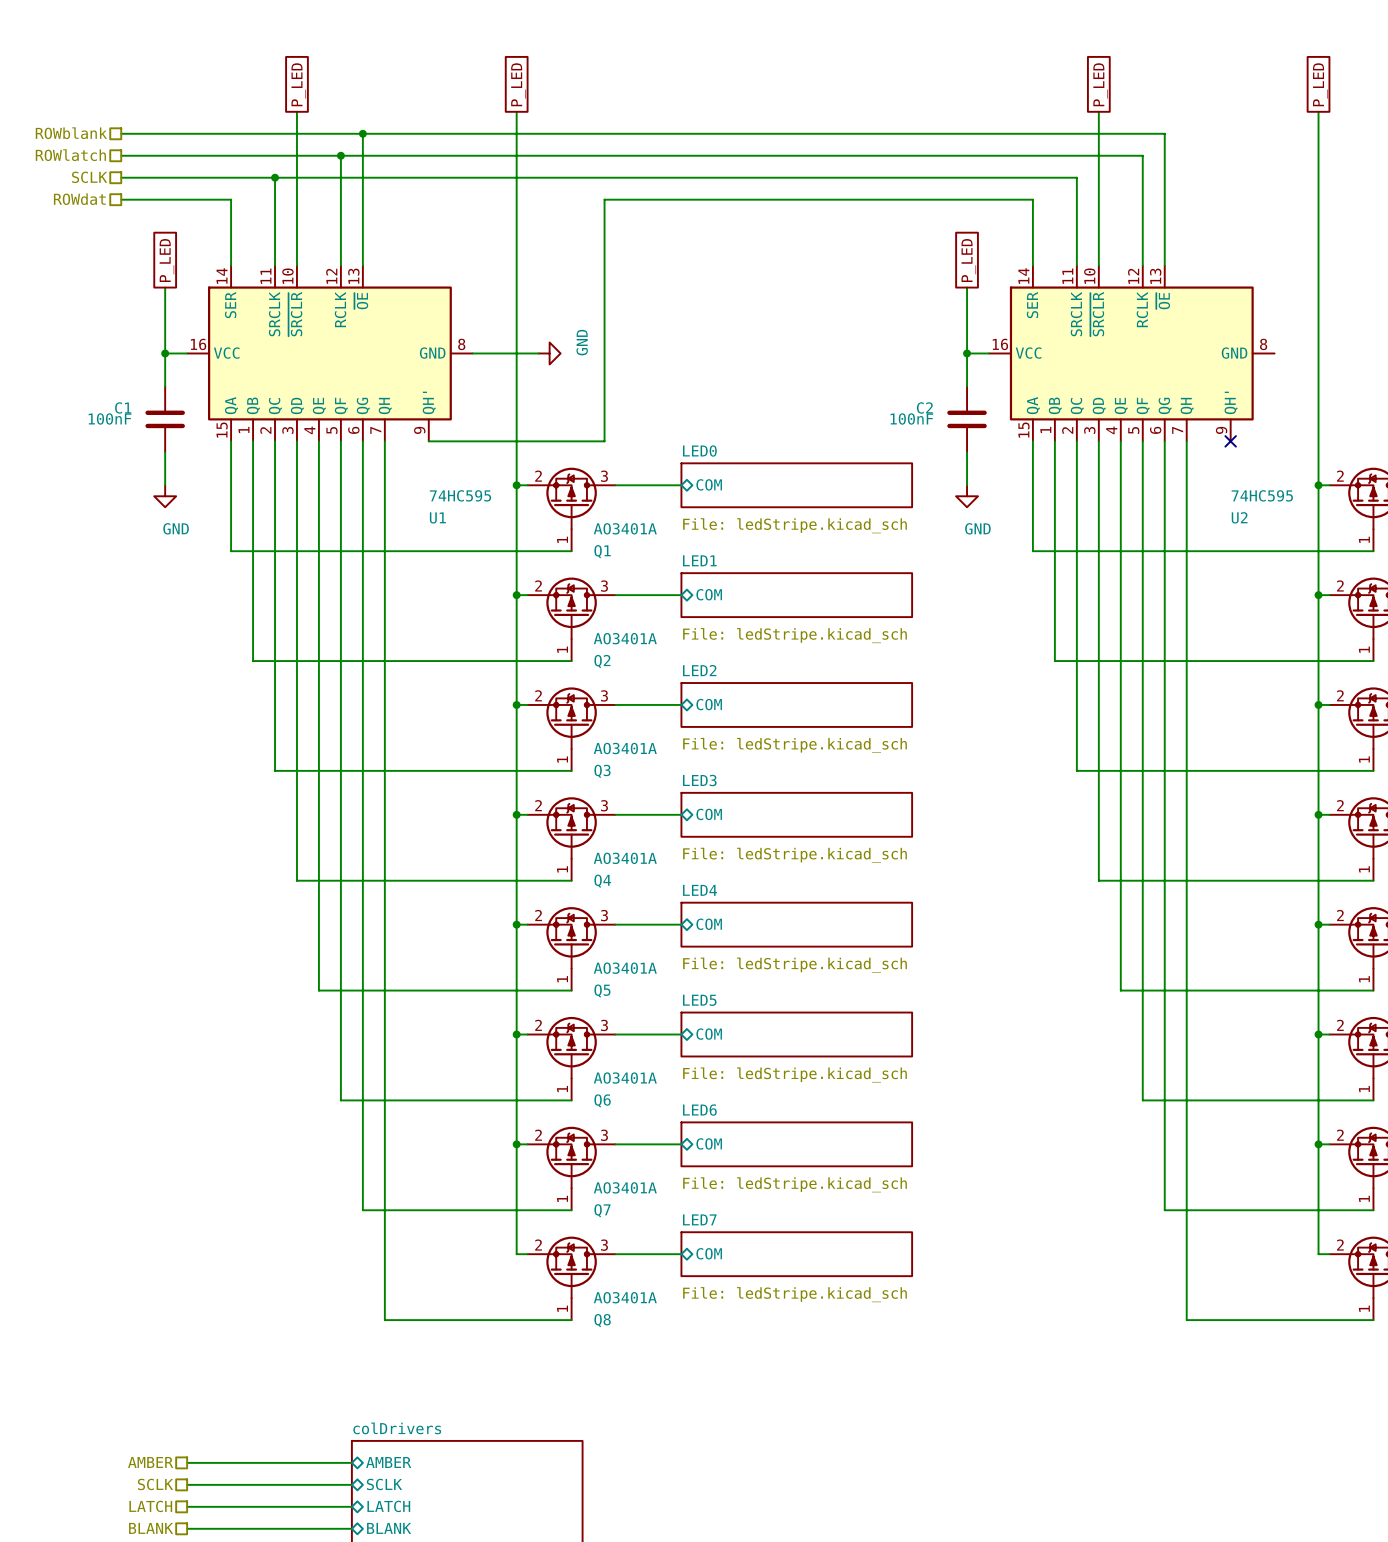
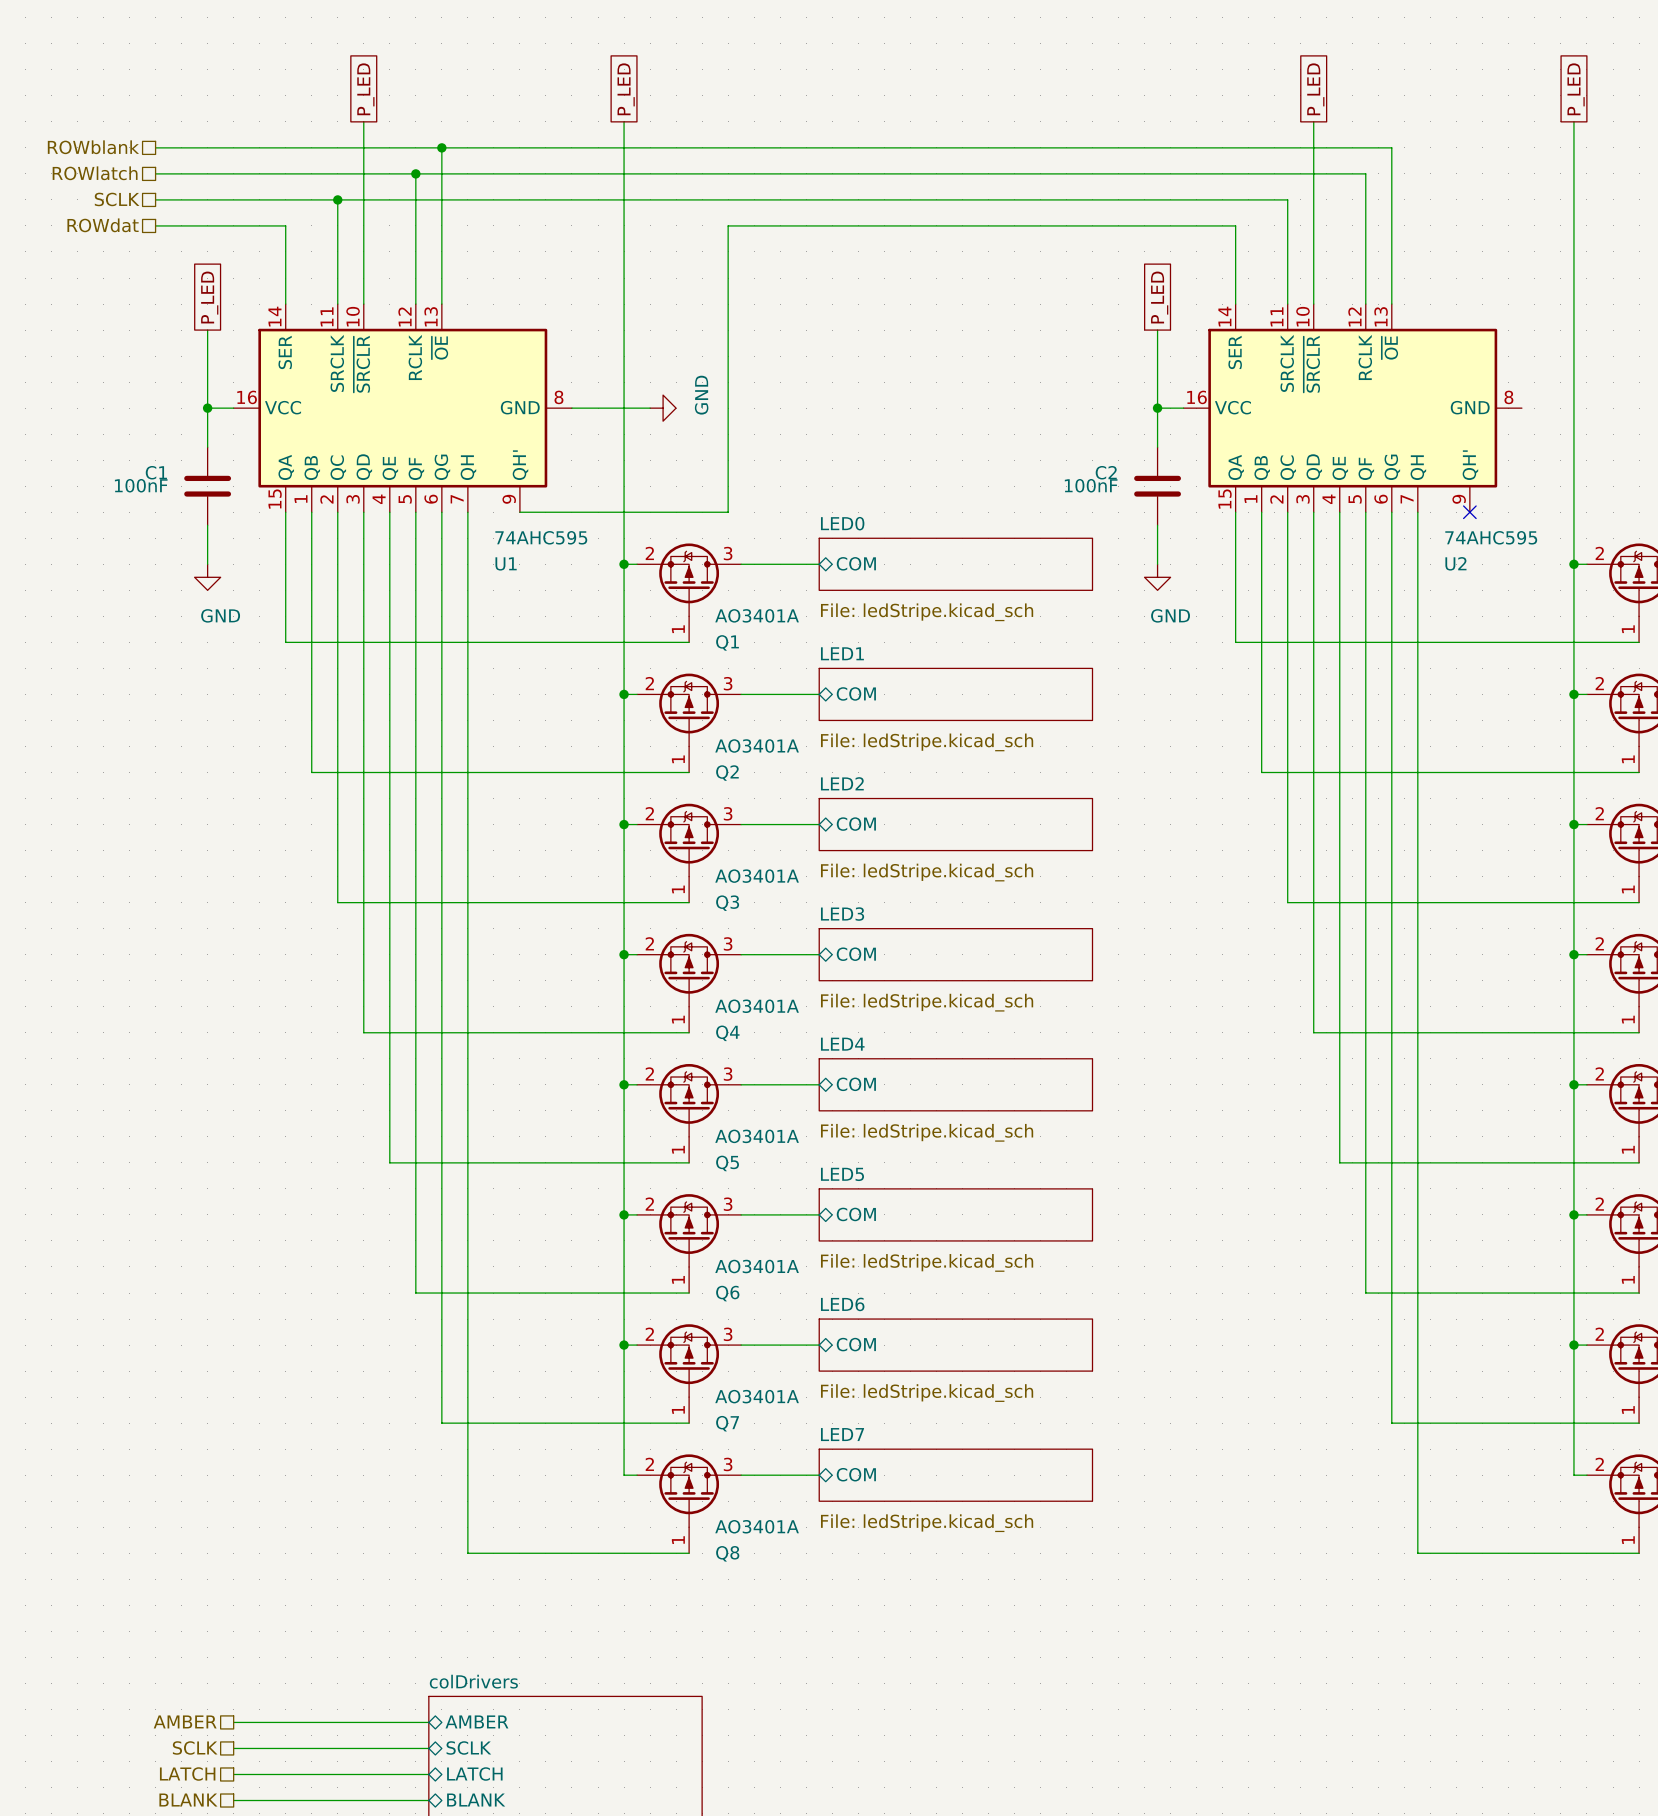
U1 value: 74HC595 (460, 495) -> 74AHC595 (541, 537)
U2 value: 74HC595 (1262, 495) -> 74AHC595 (1491, 537)
U1 name position: U1 (437, 517) -> U1 (506, 563)
U2 name position: U2 (1239, 517) -> U2 (1455, 563)

